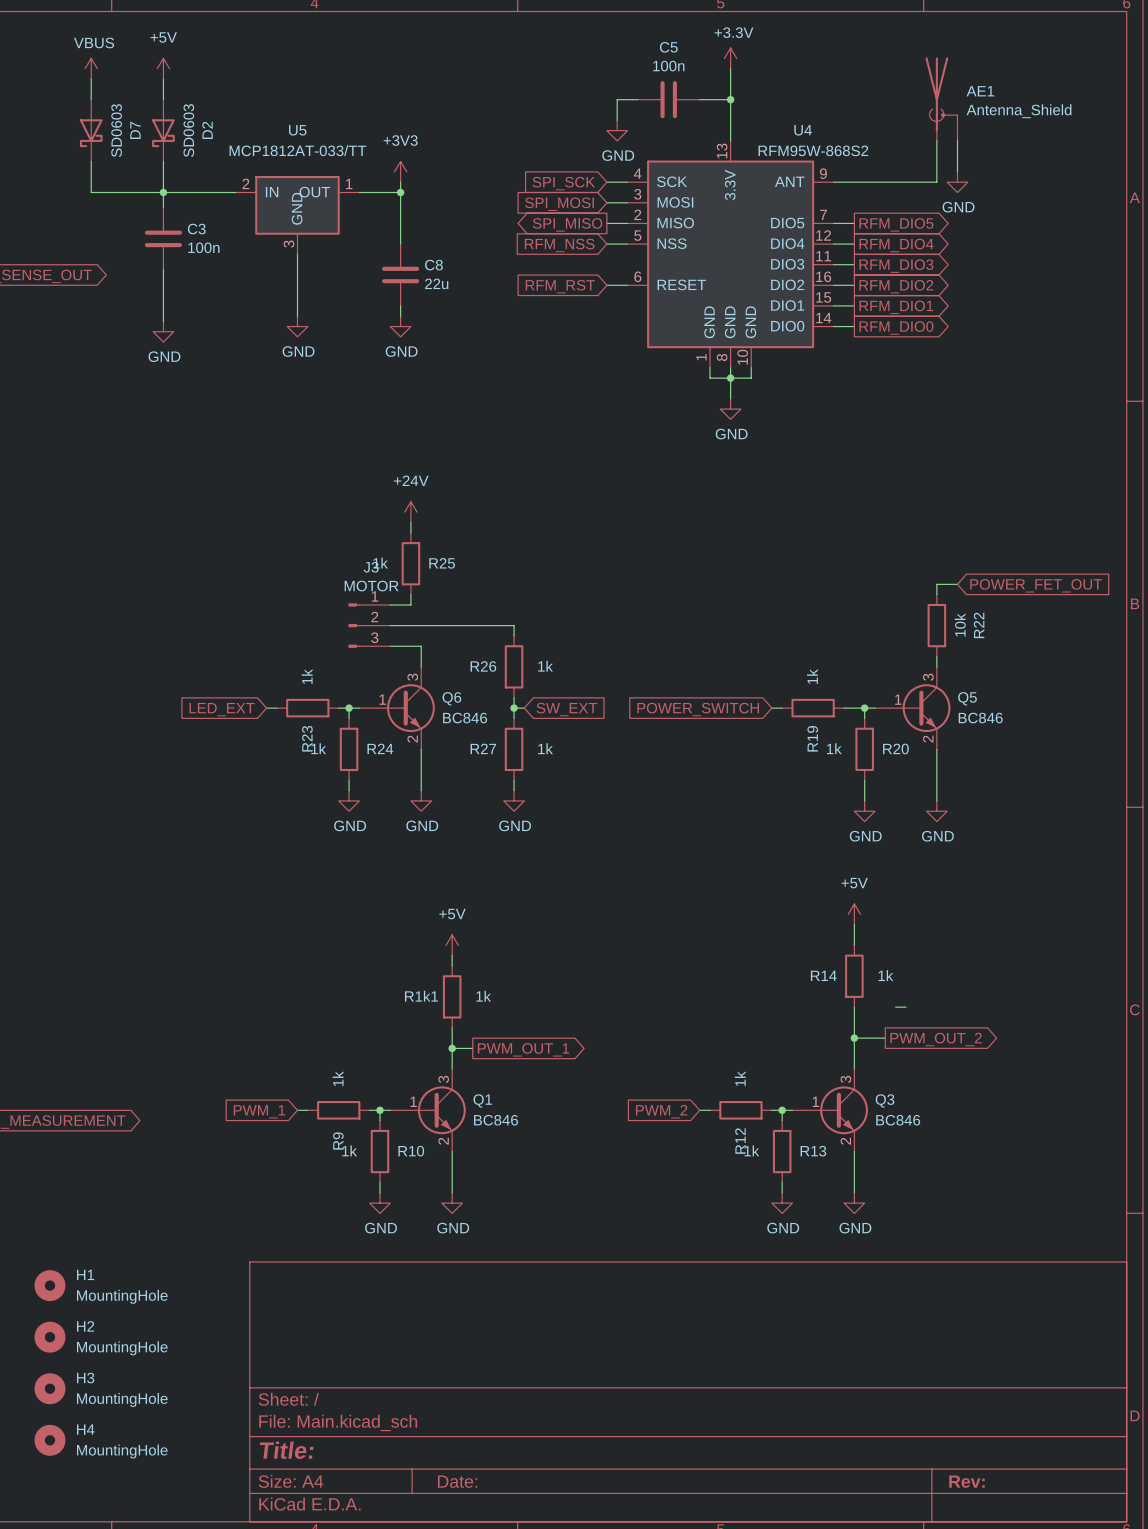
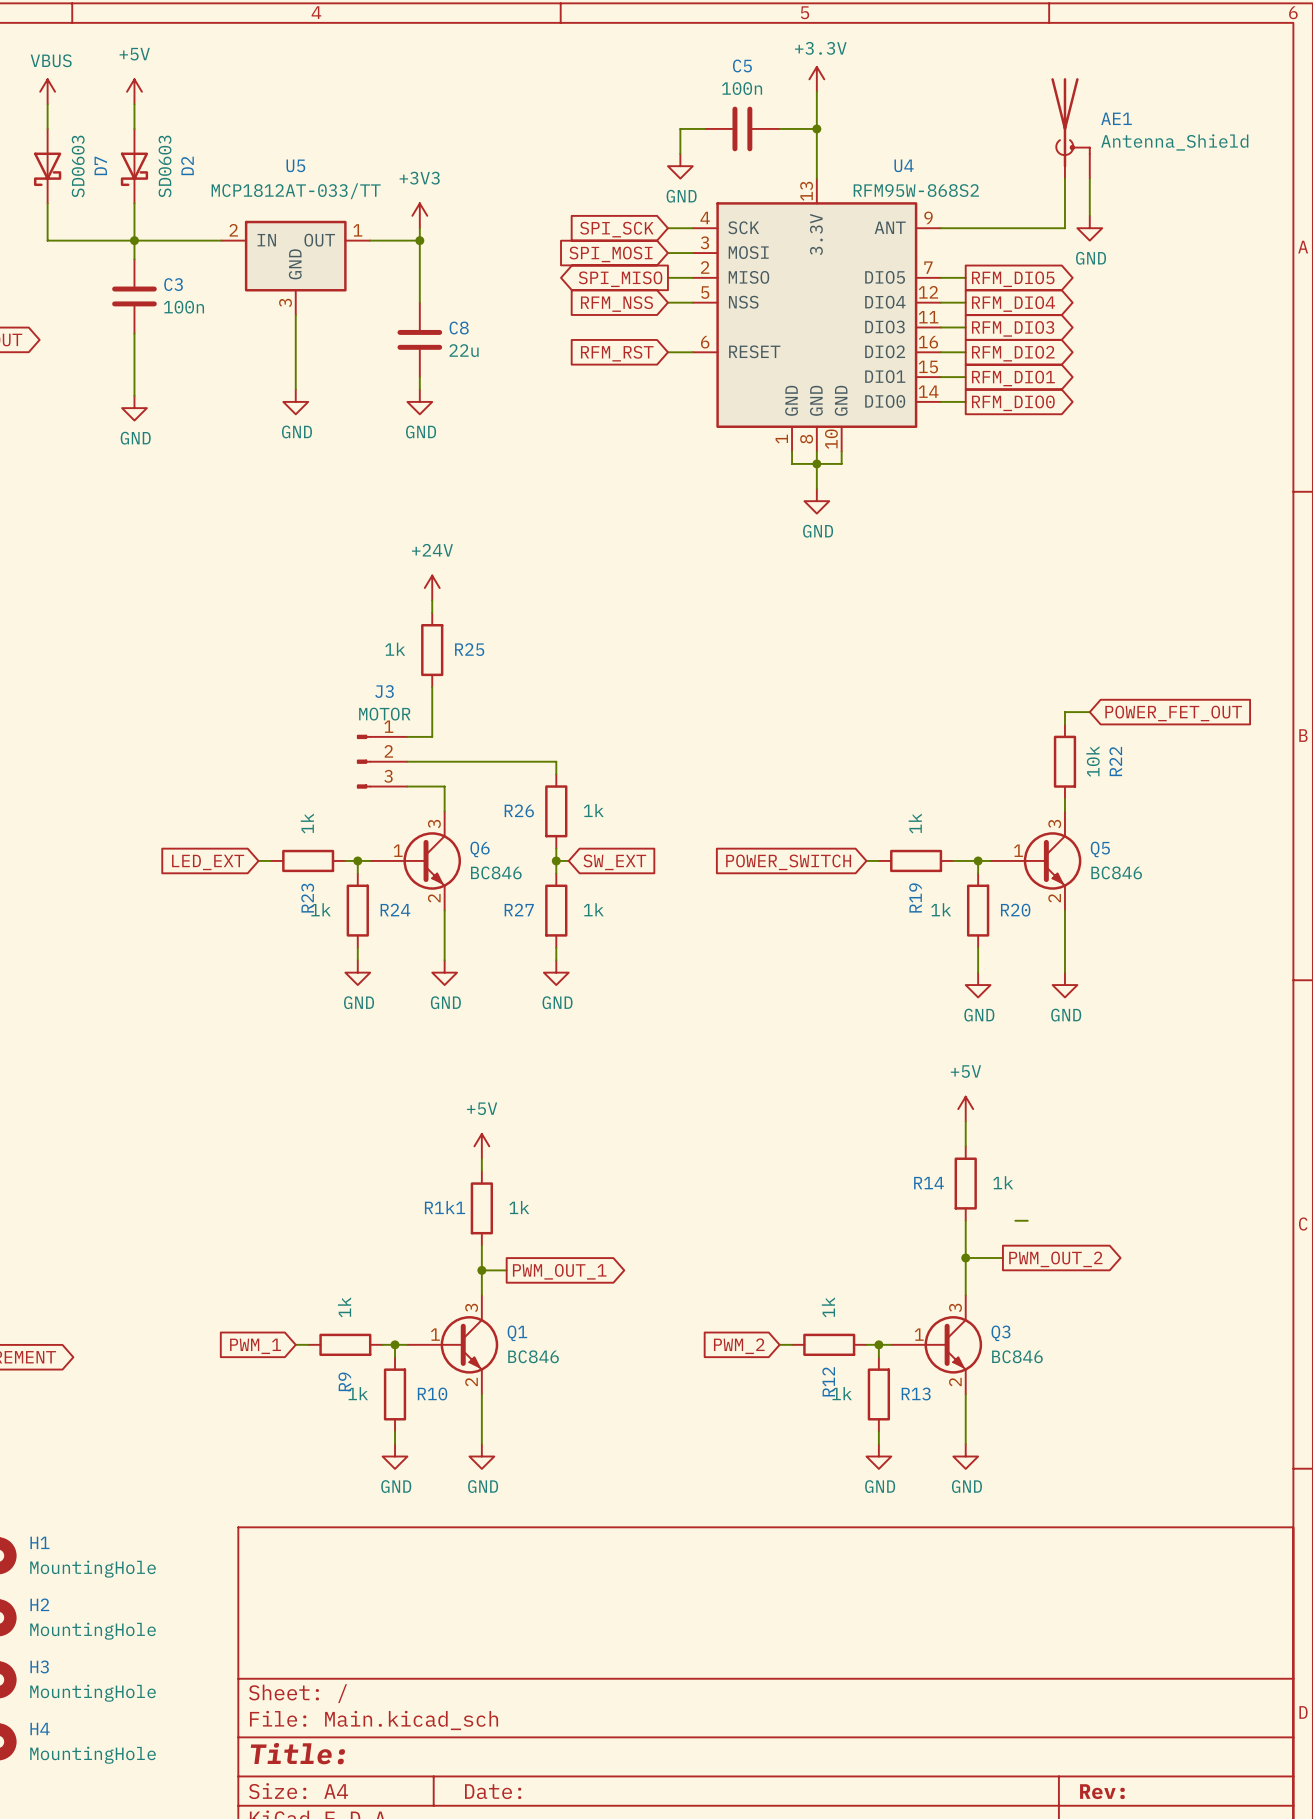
power symbol position: +24V (410, 512) -> +24V (432, 588)
wire: (410, 522) (410, 532) -> (432, 600) (432, 612)
wire: none -> (432, 687) (432, 724)
R25 position: (410, 563) -> (432, 650)

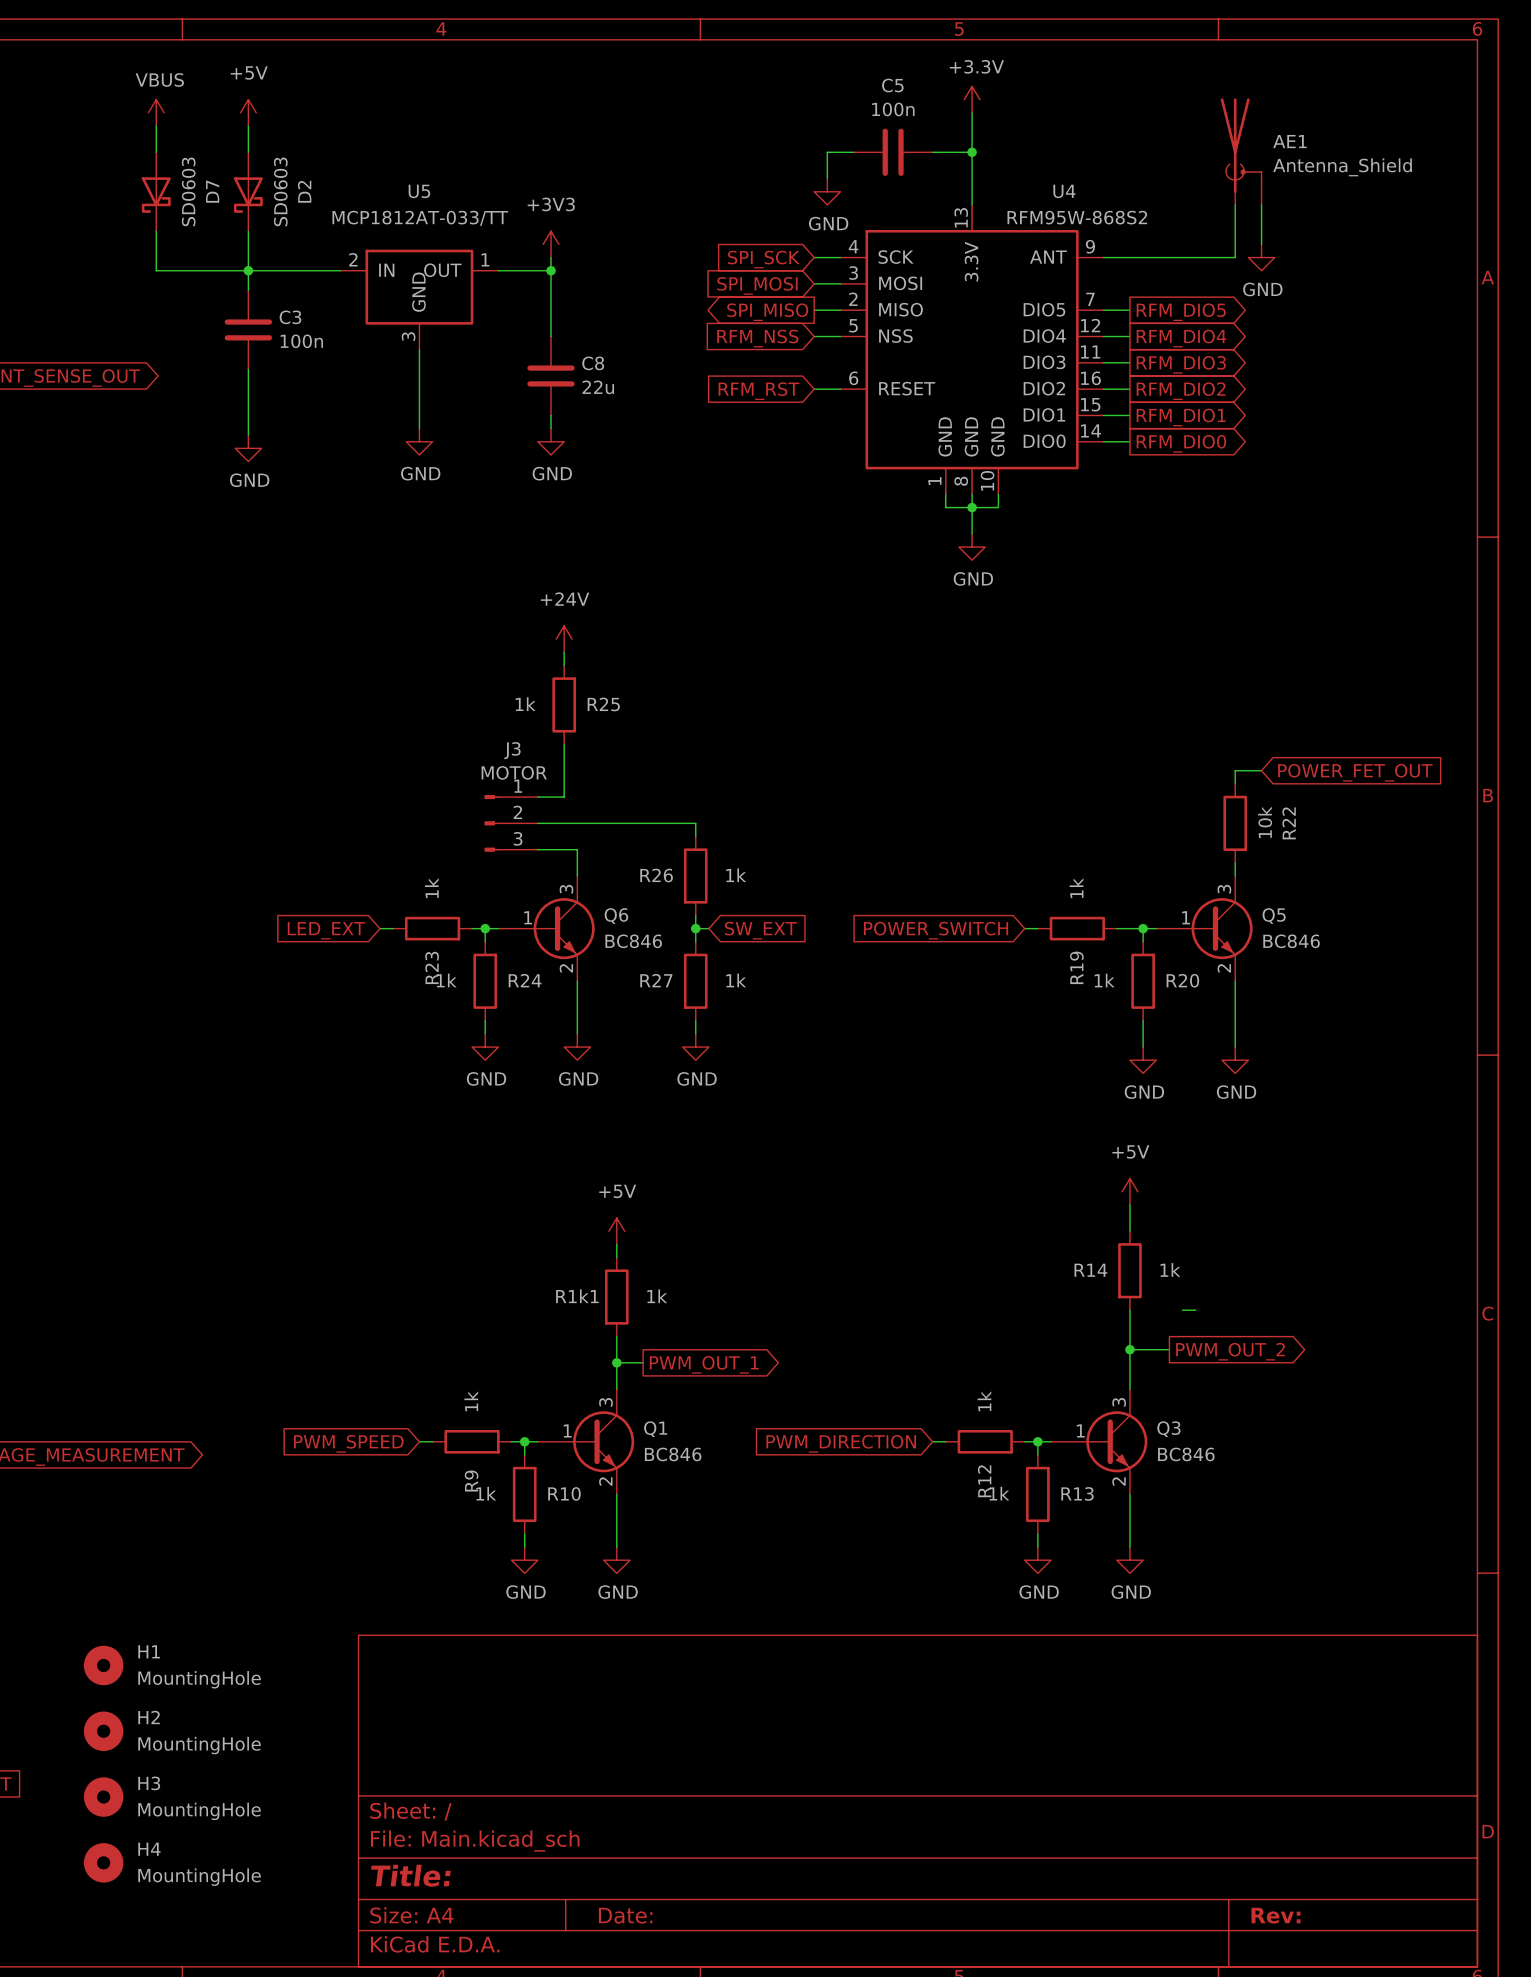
global label: PWM_1 (255, 1346) -> PWM_SPEED (348, 1443)
global label: PWM_2 (739, 1346) -> PWM_DIRECTION (841, 1443)

